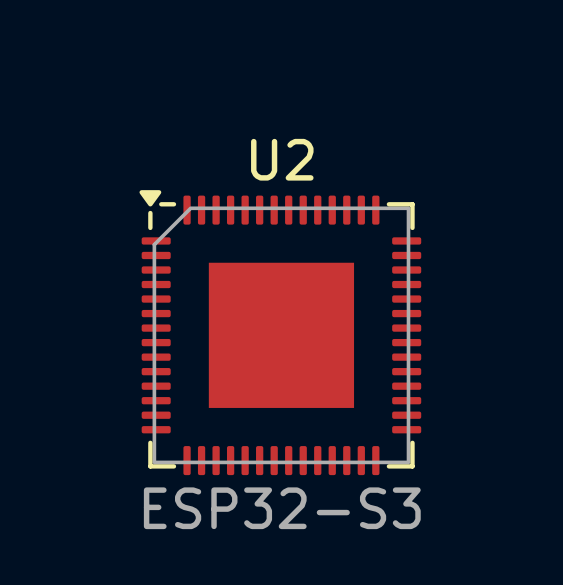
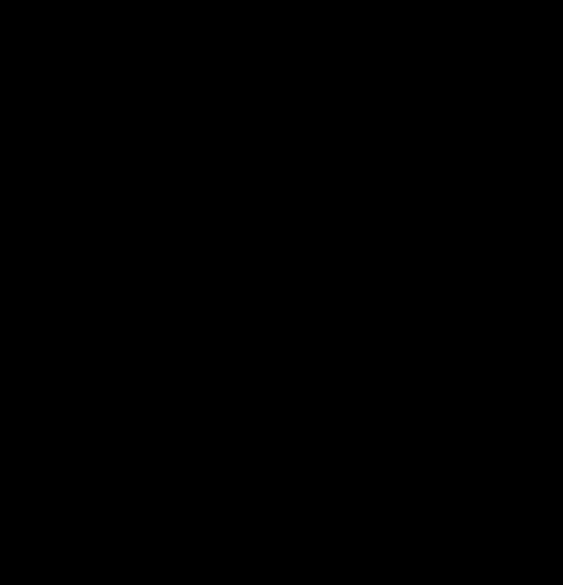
U2: ESP32-S3 (280, 332) -> none

